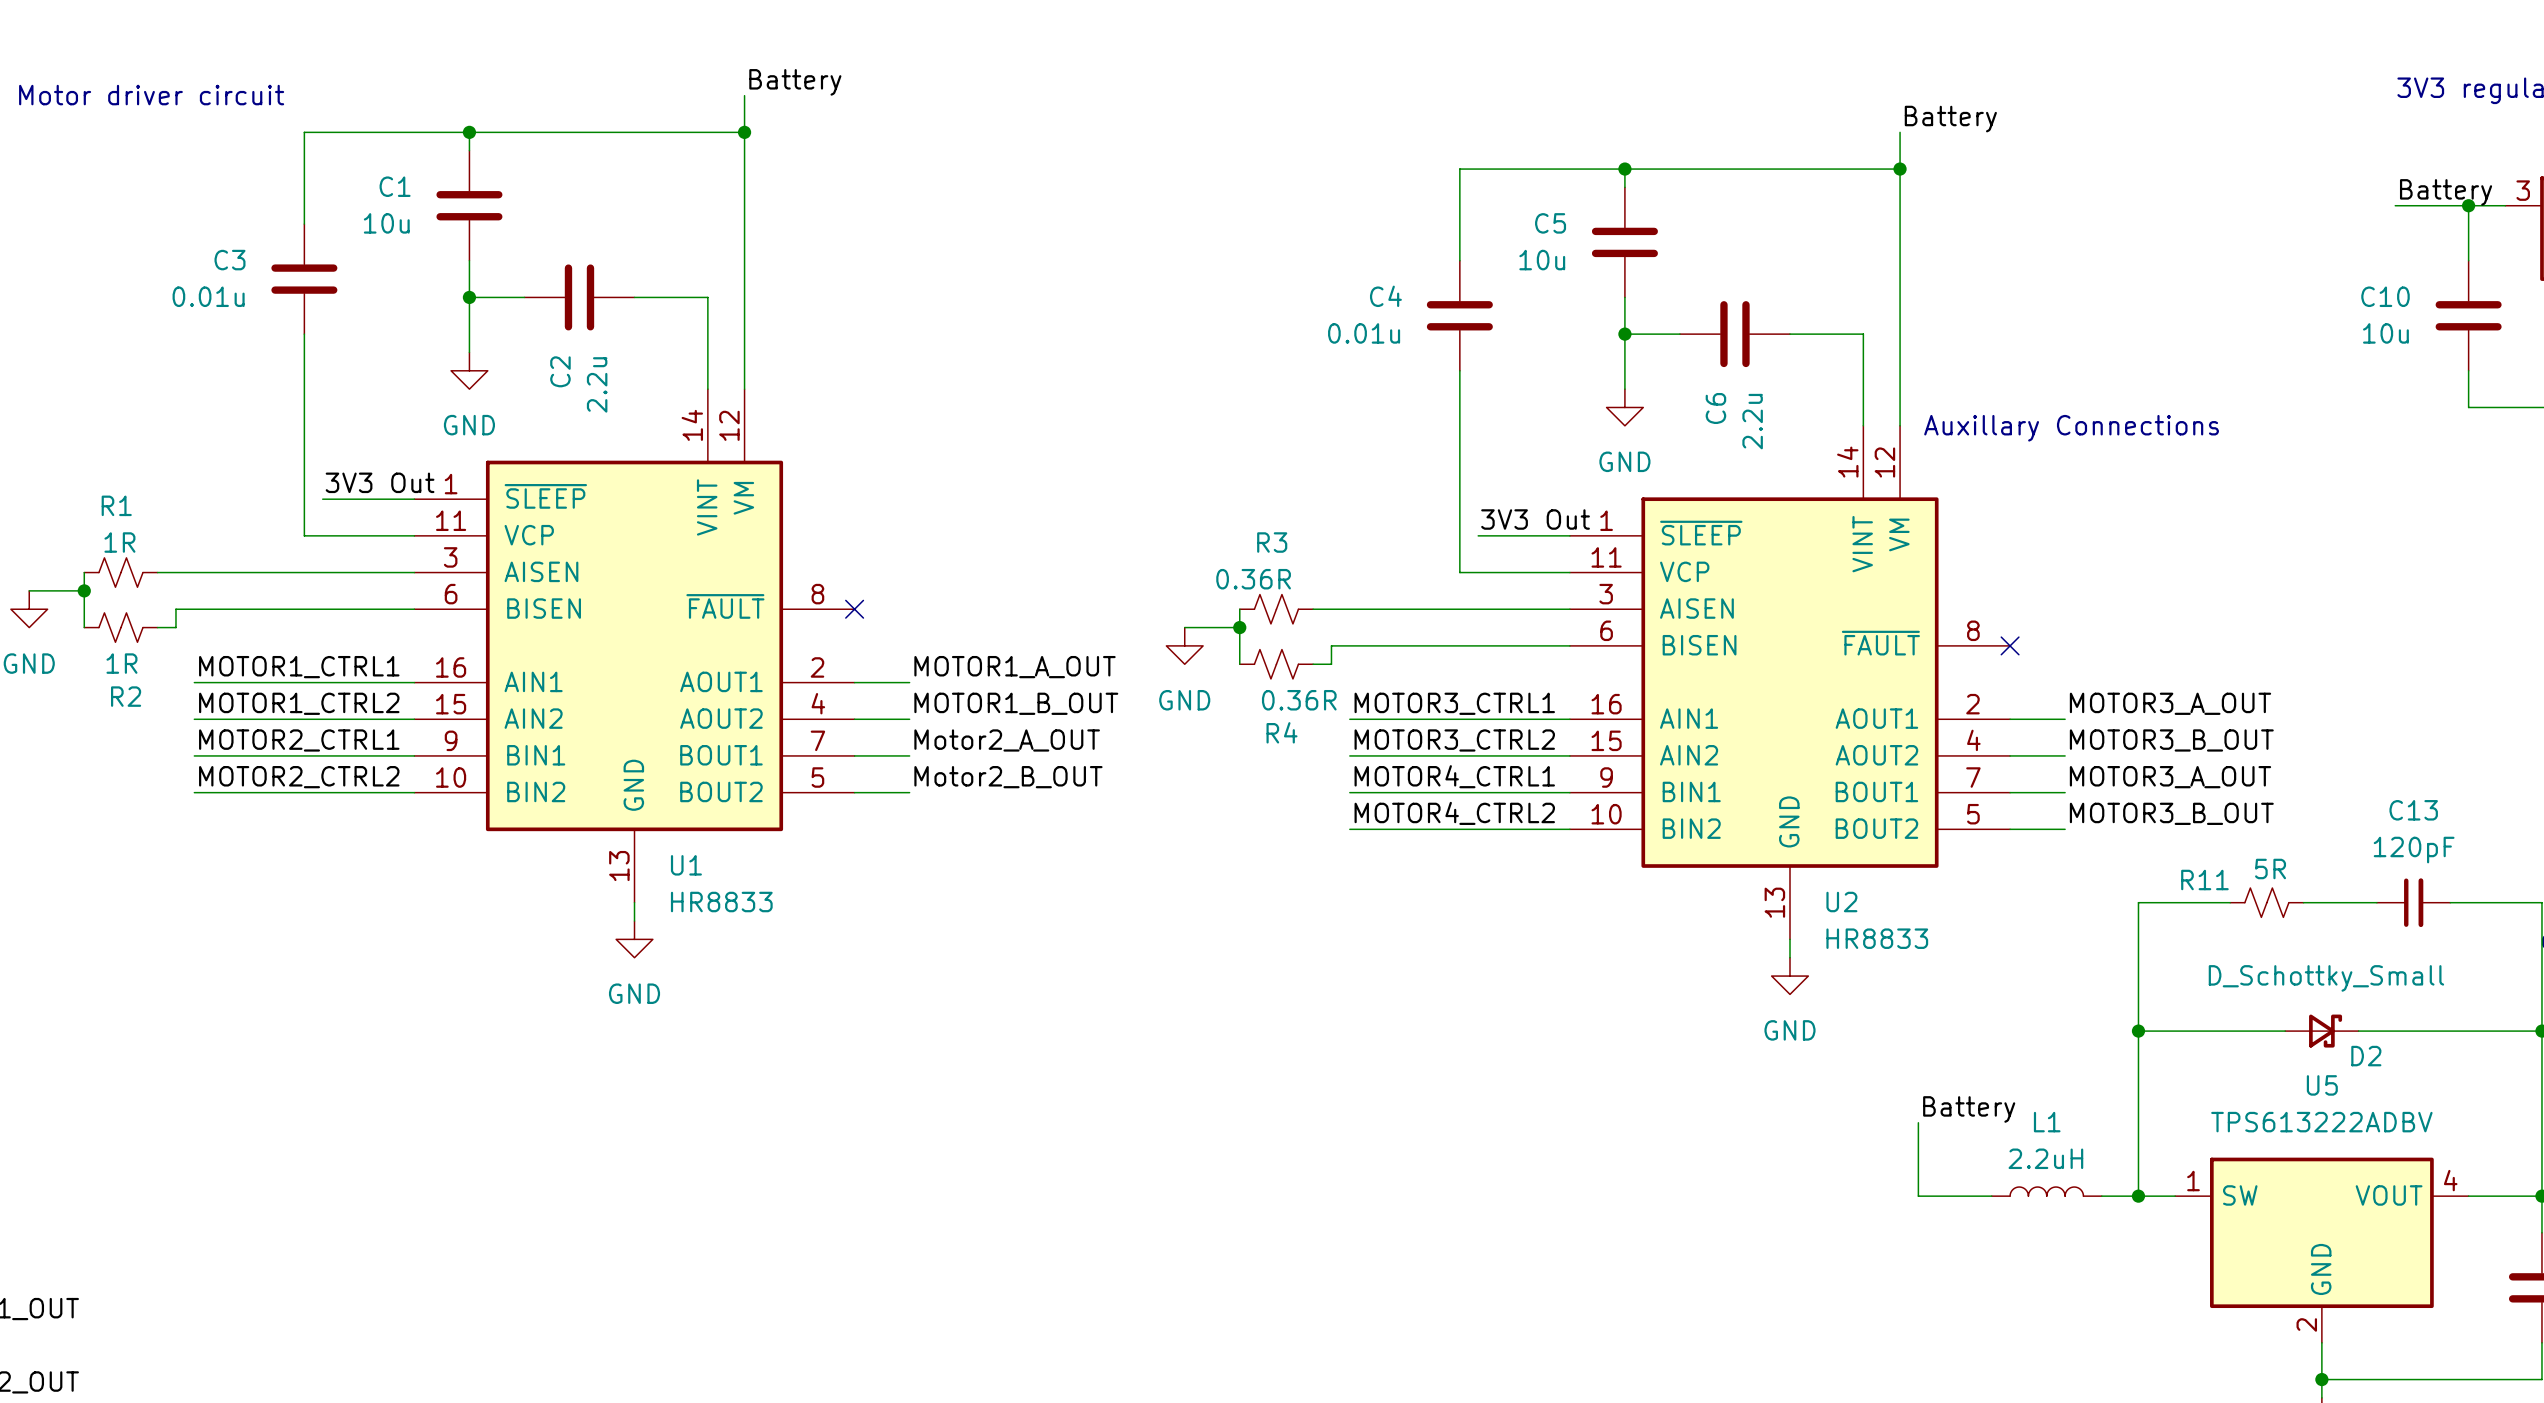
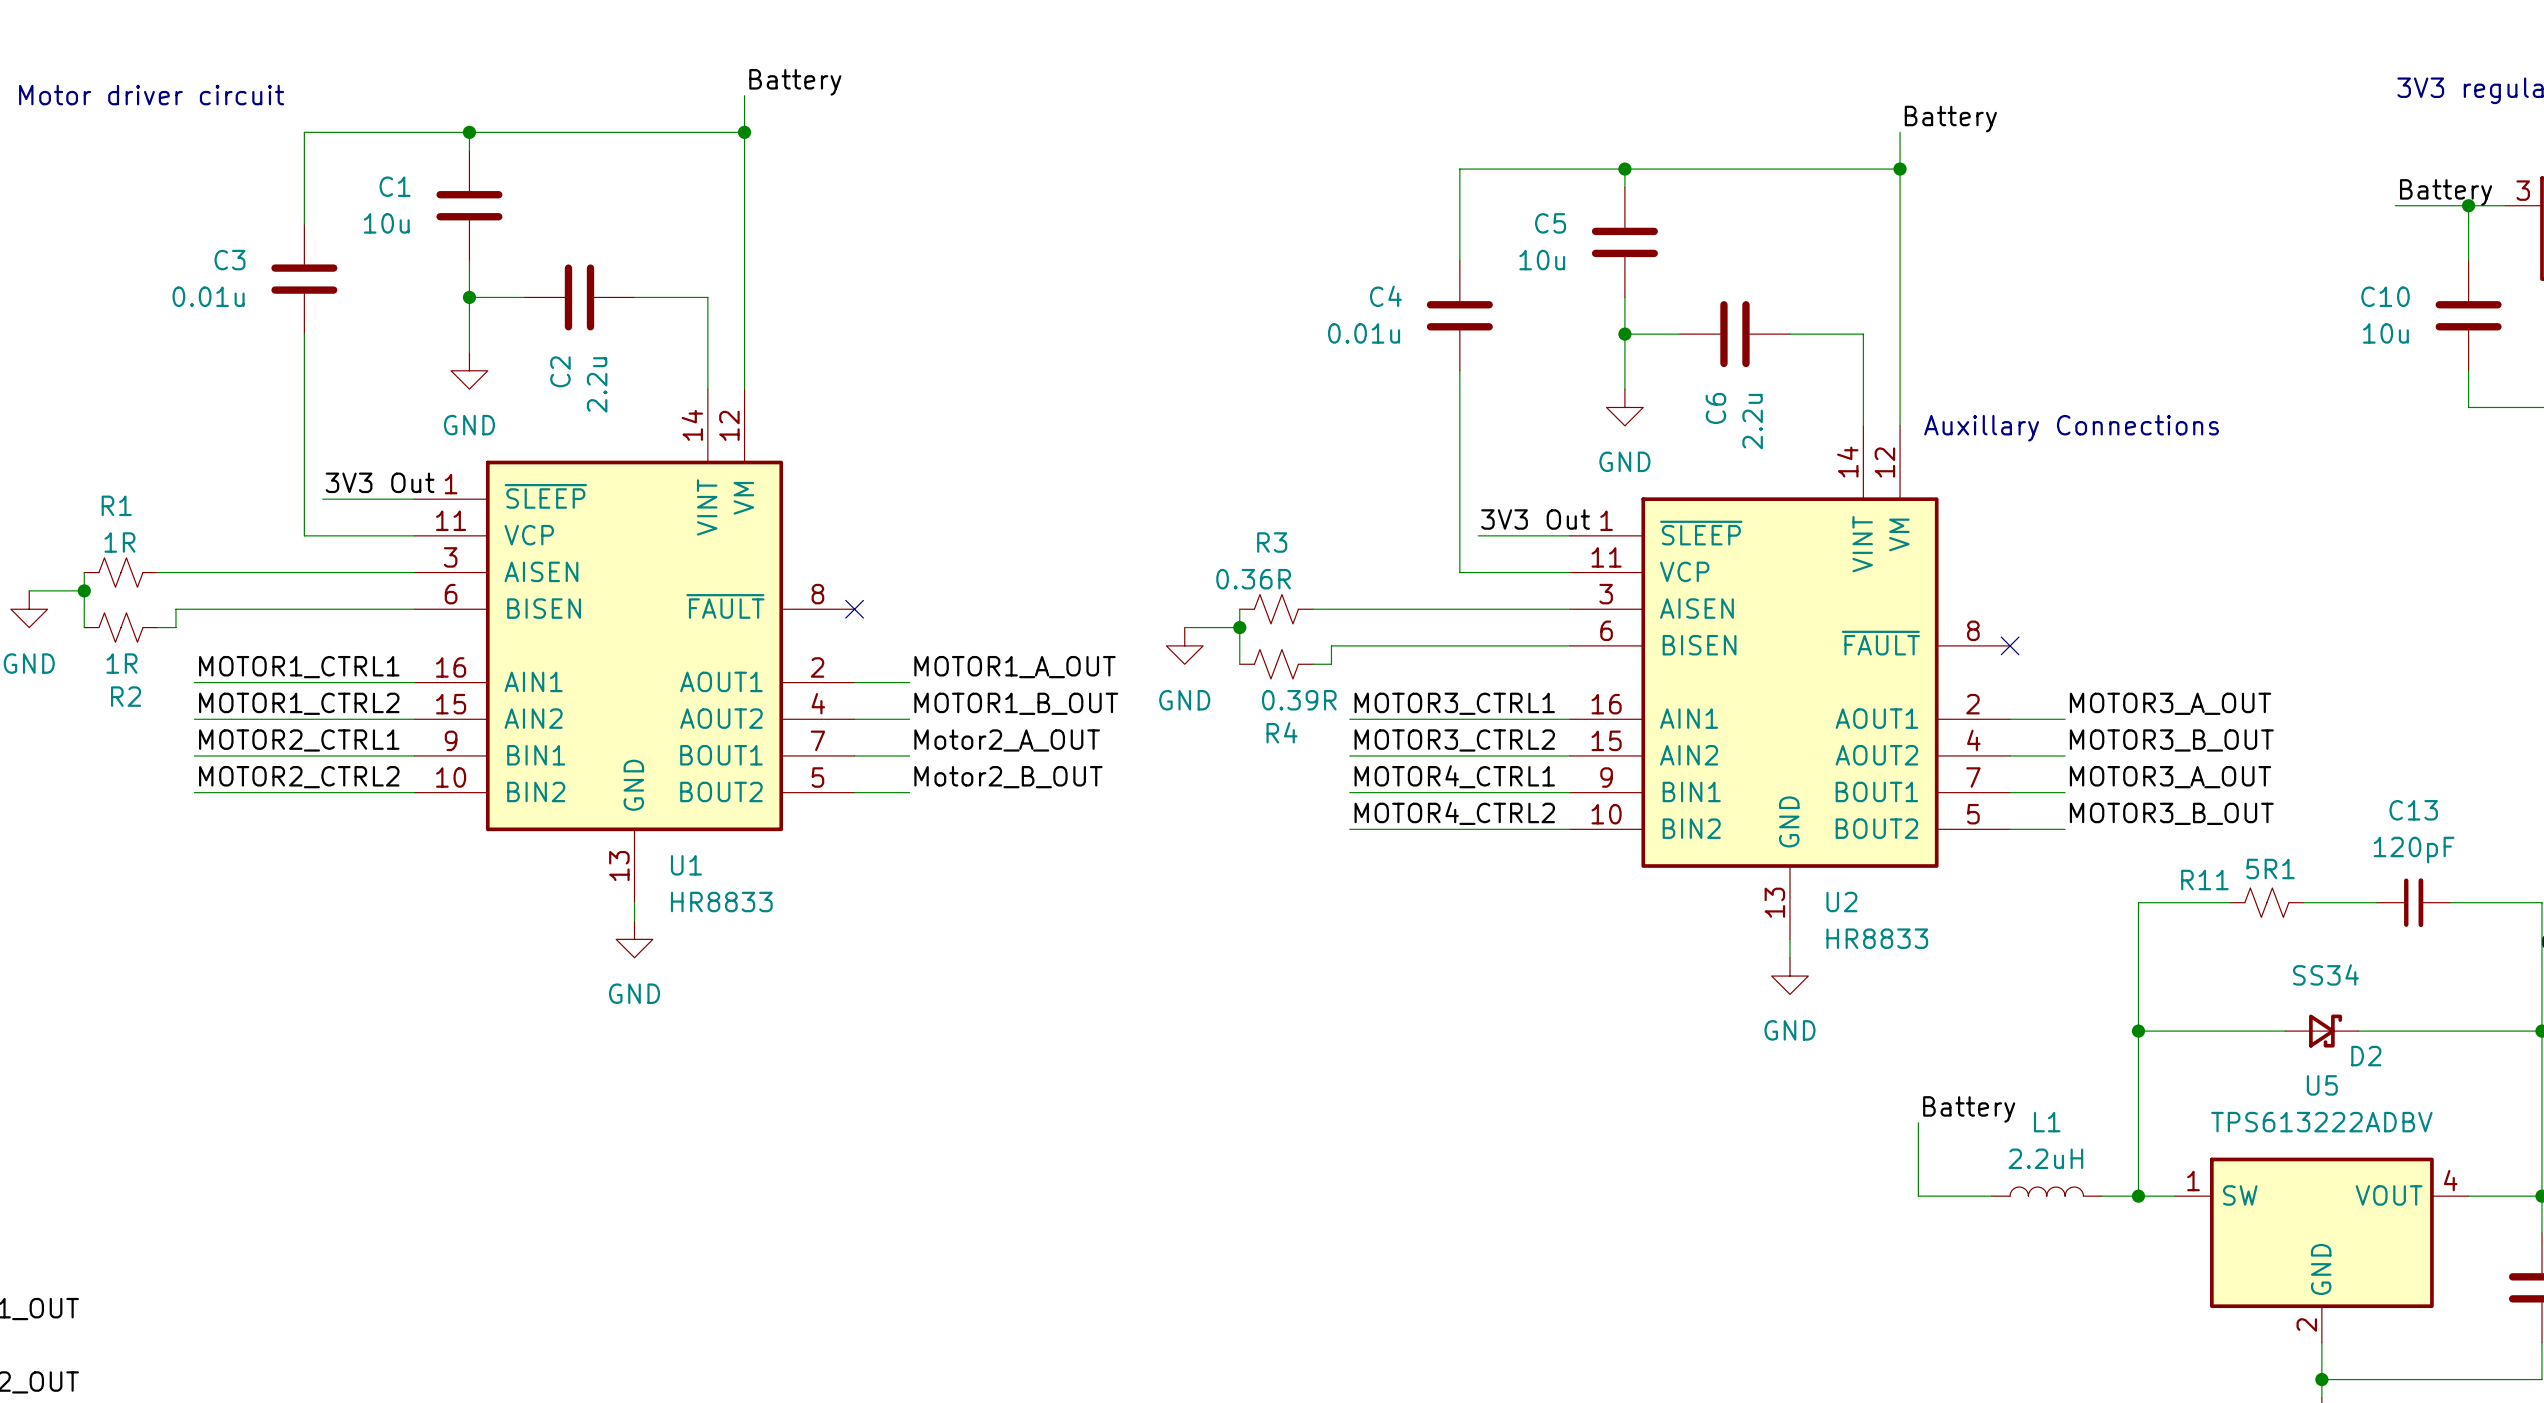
R4 value: 0.36R (1299, 700) -> 0.39R (1299, 700)
R11 value: 5R (2270, 868) -> 5R1 (2270, 868)
D2 value: D_Schottky_Small (2326, 978) -> SS34 (2325, 974)

